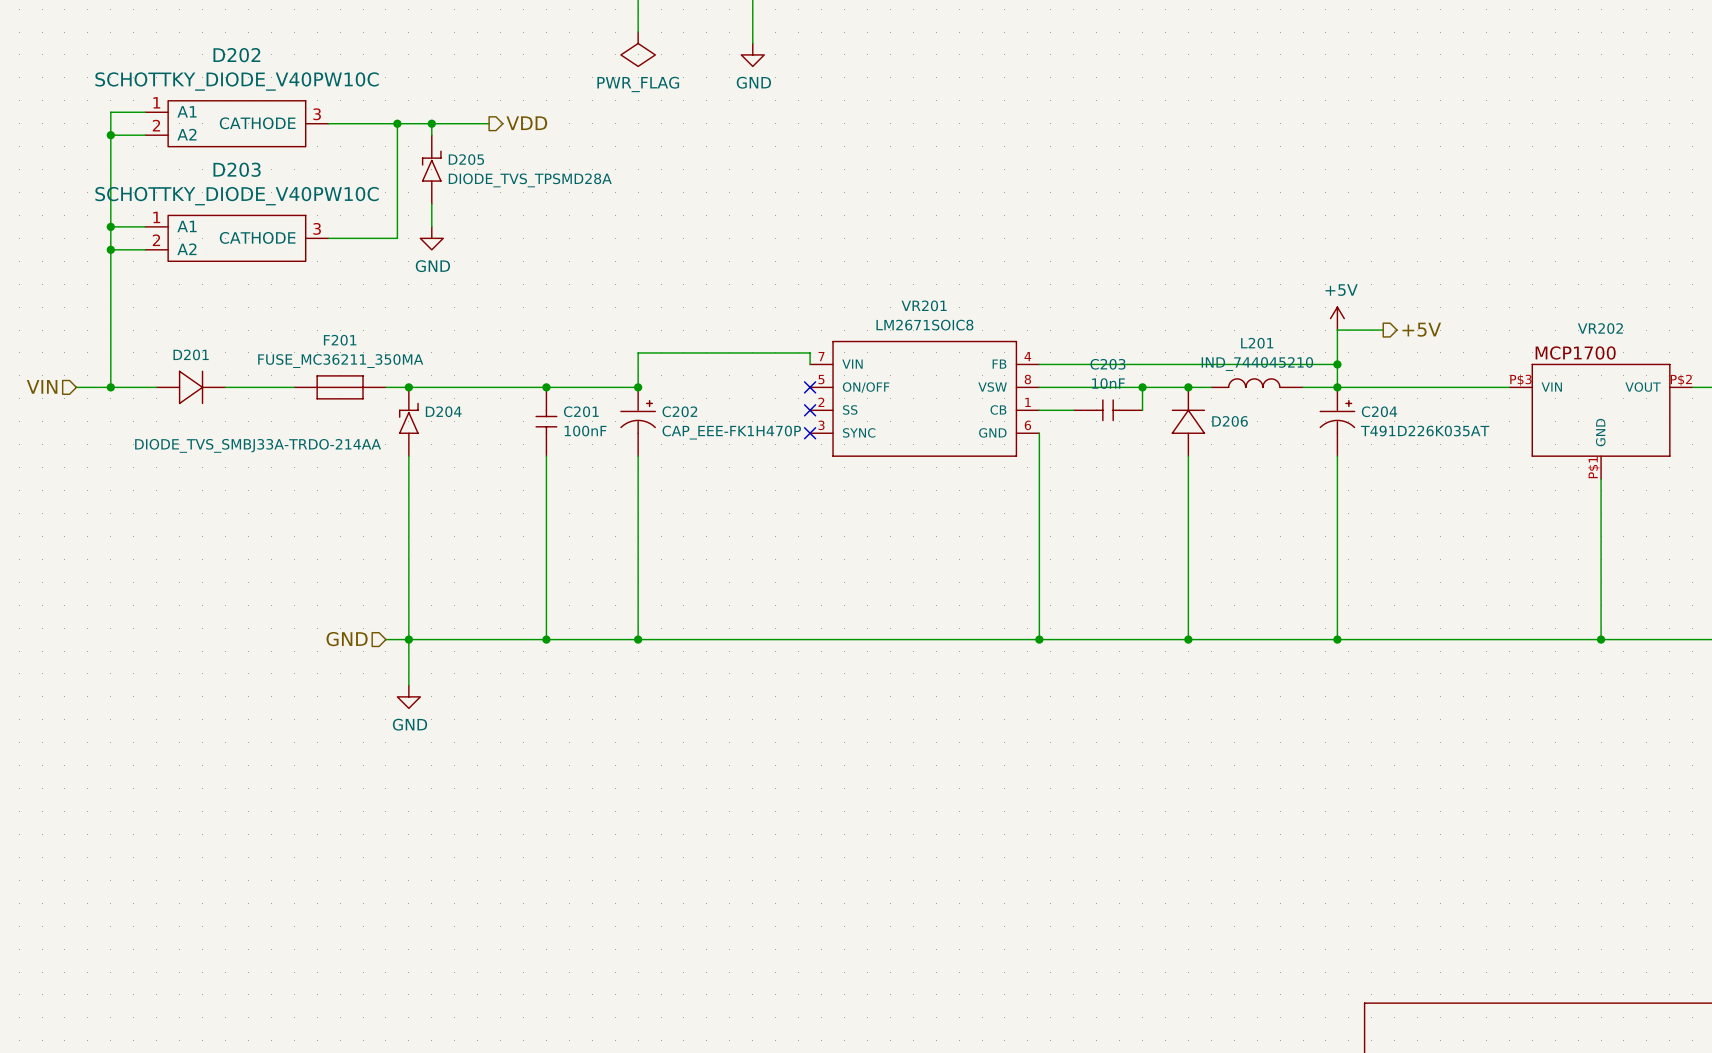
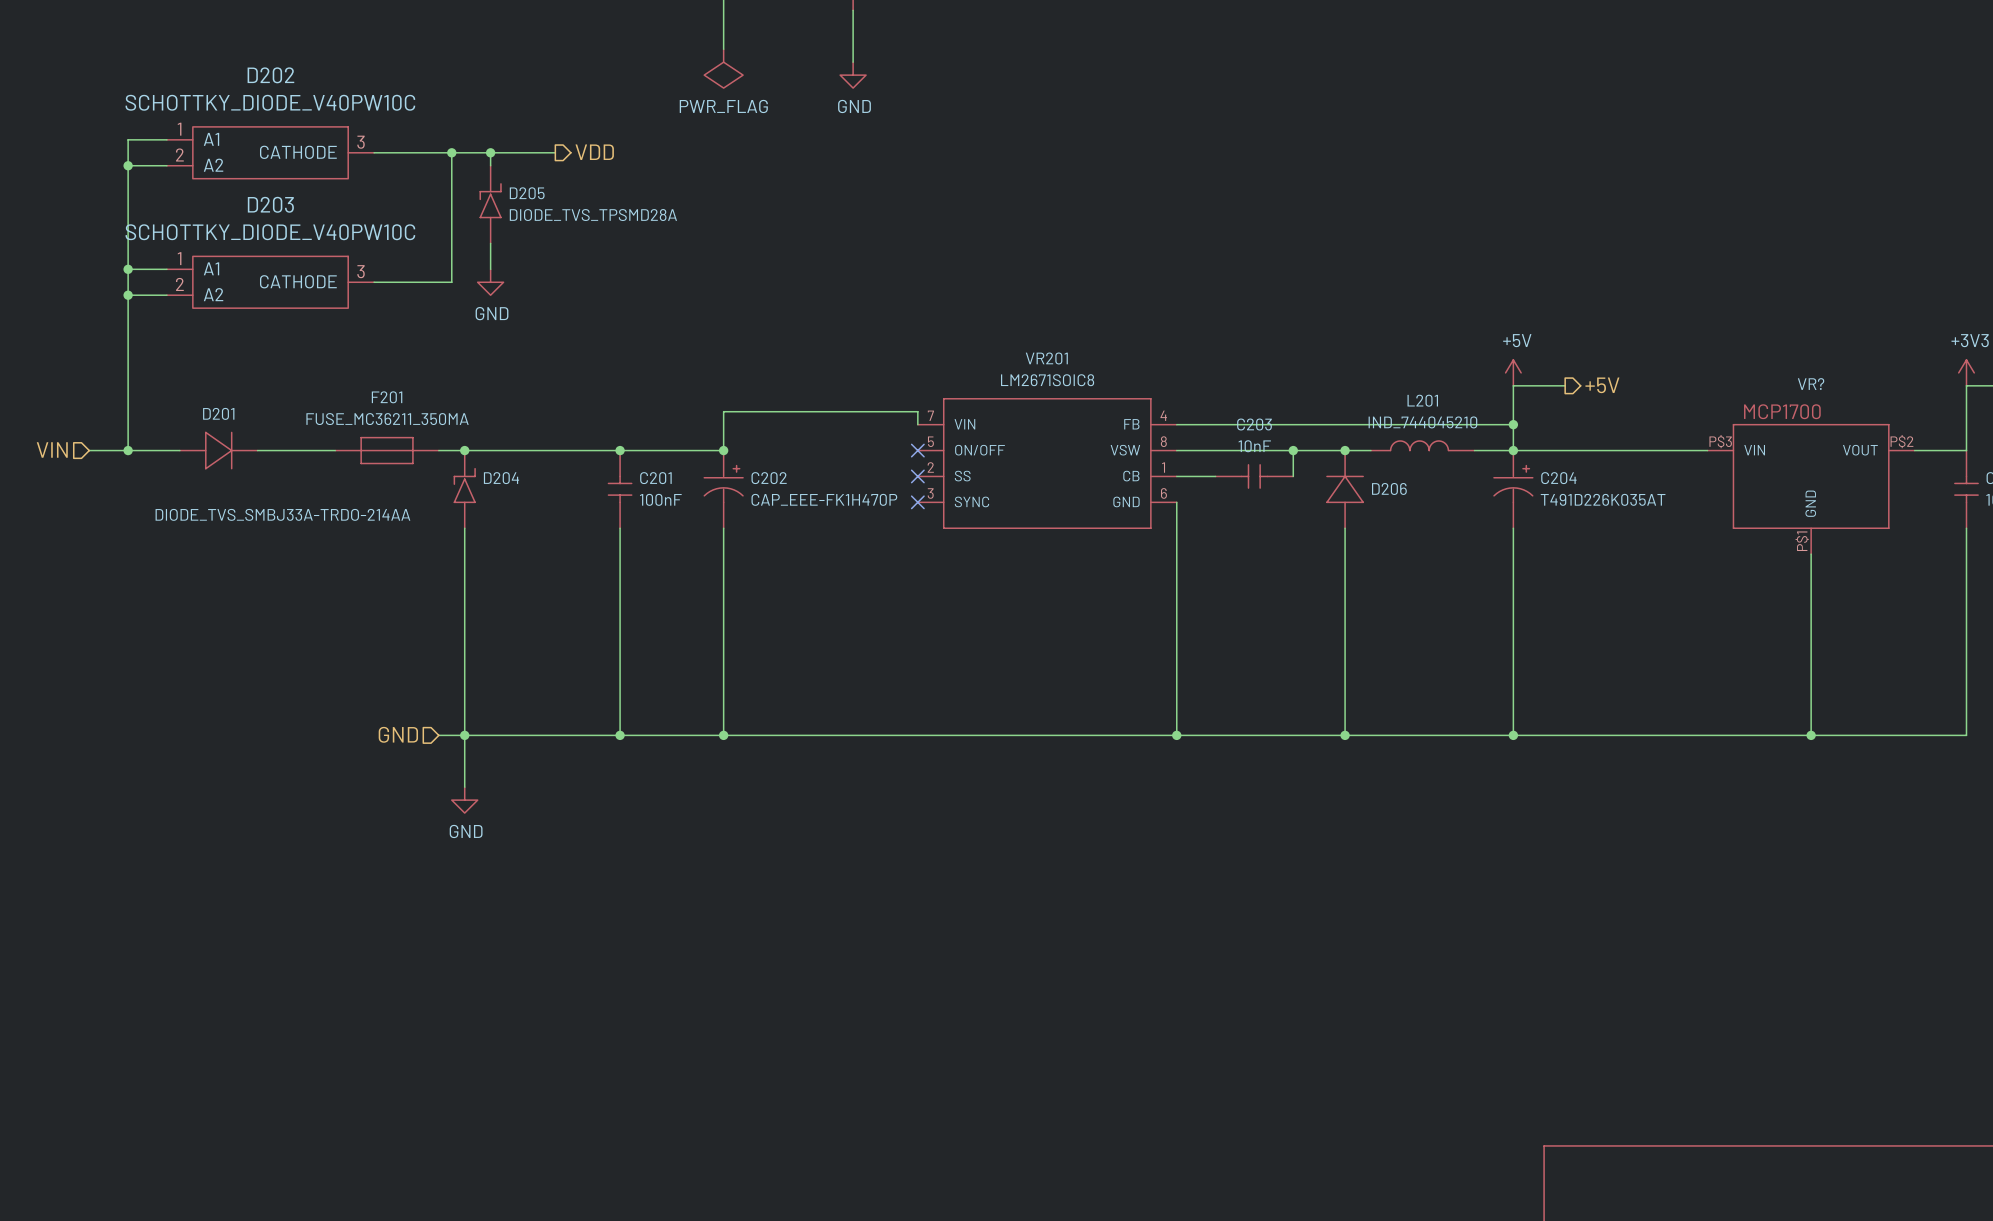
VR202 name: VR202 (1600, 328) -> VR? (1811, 384)

